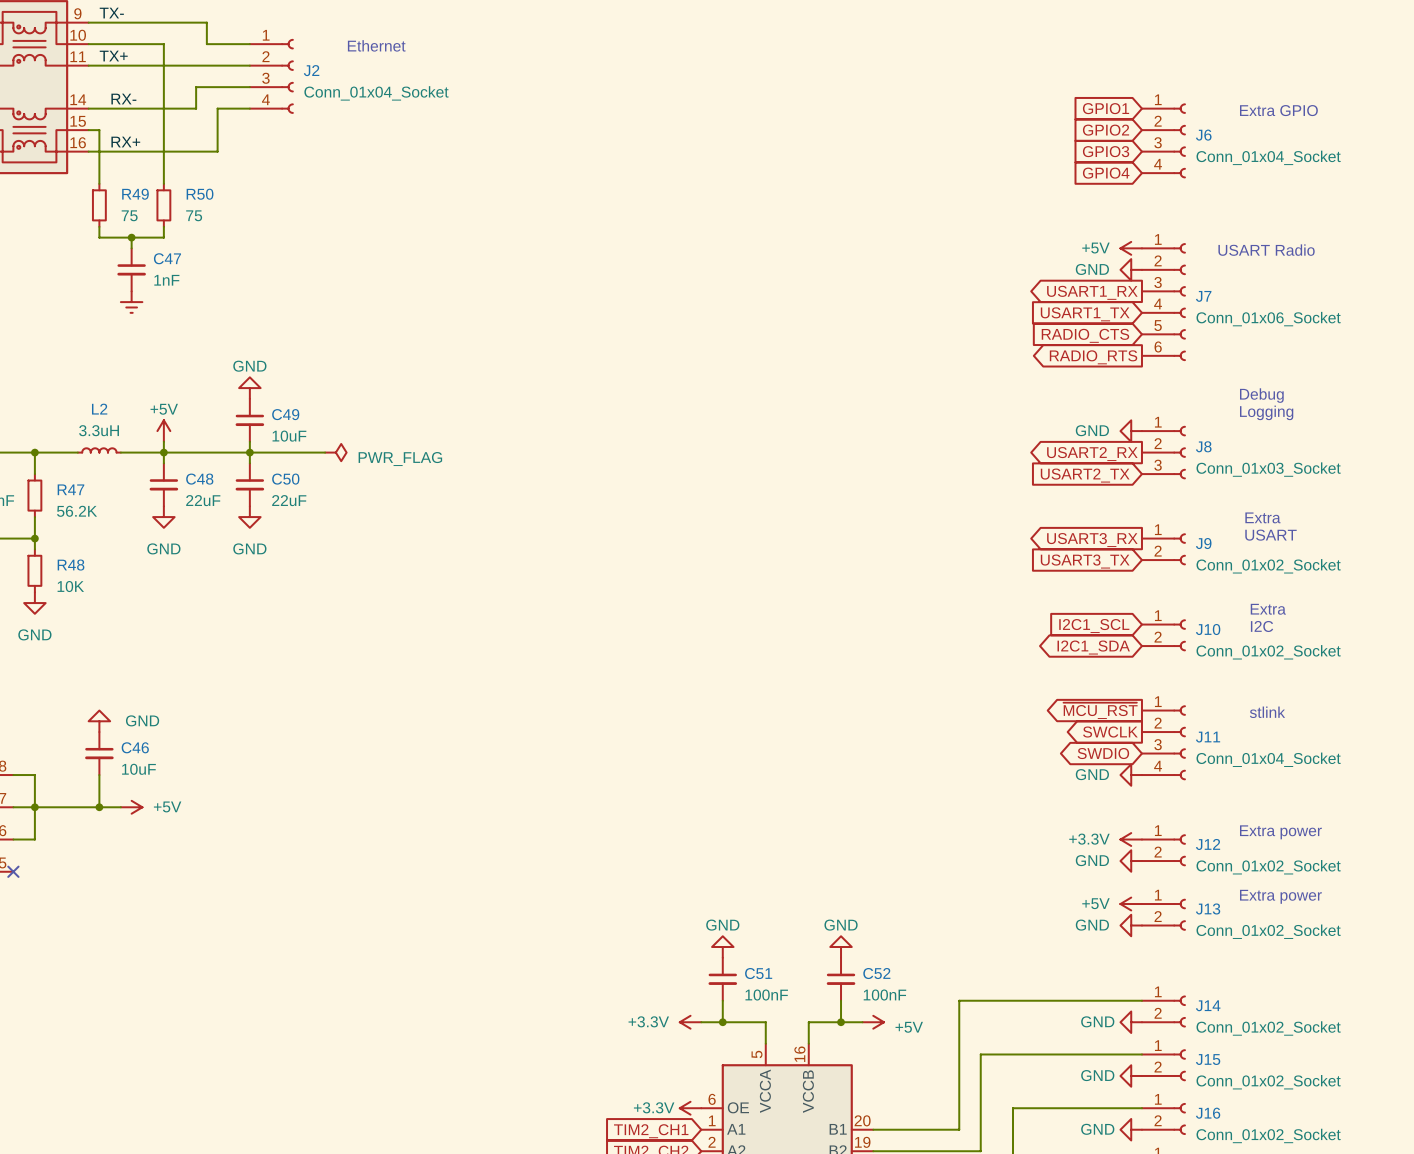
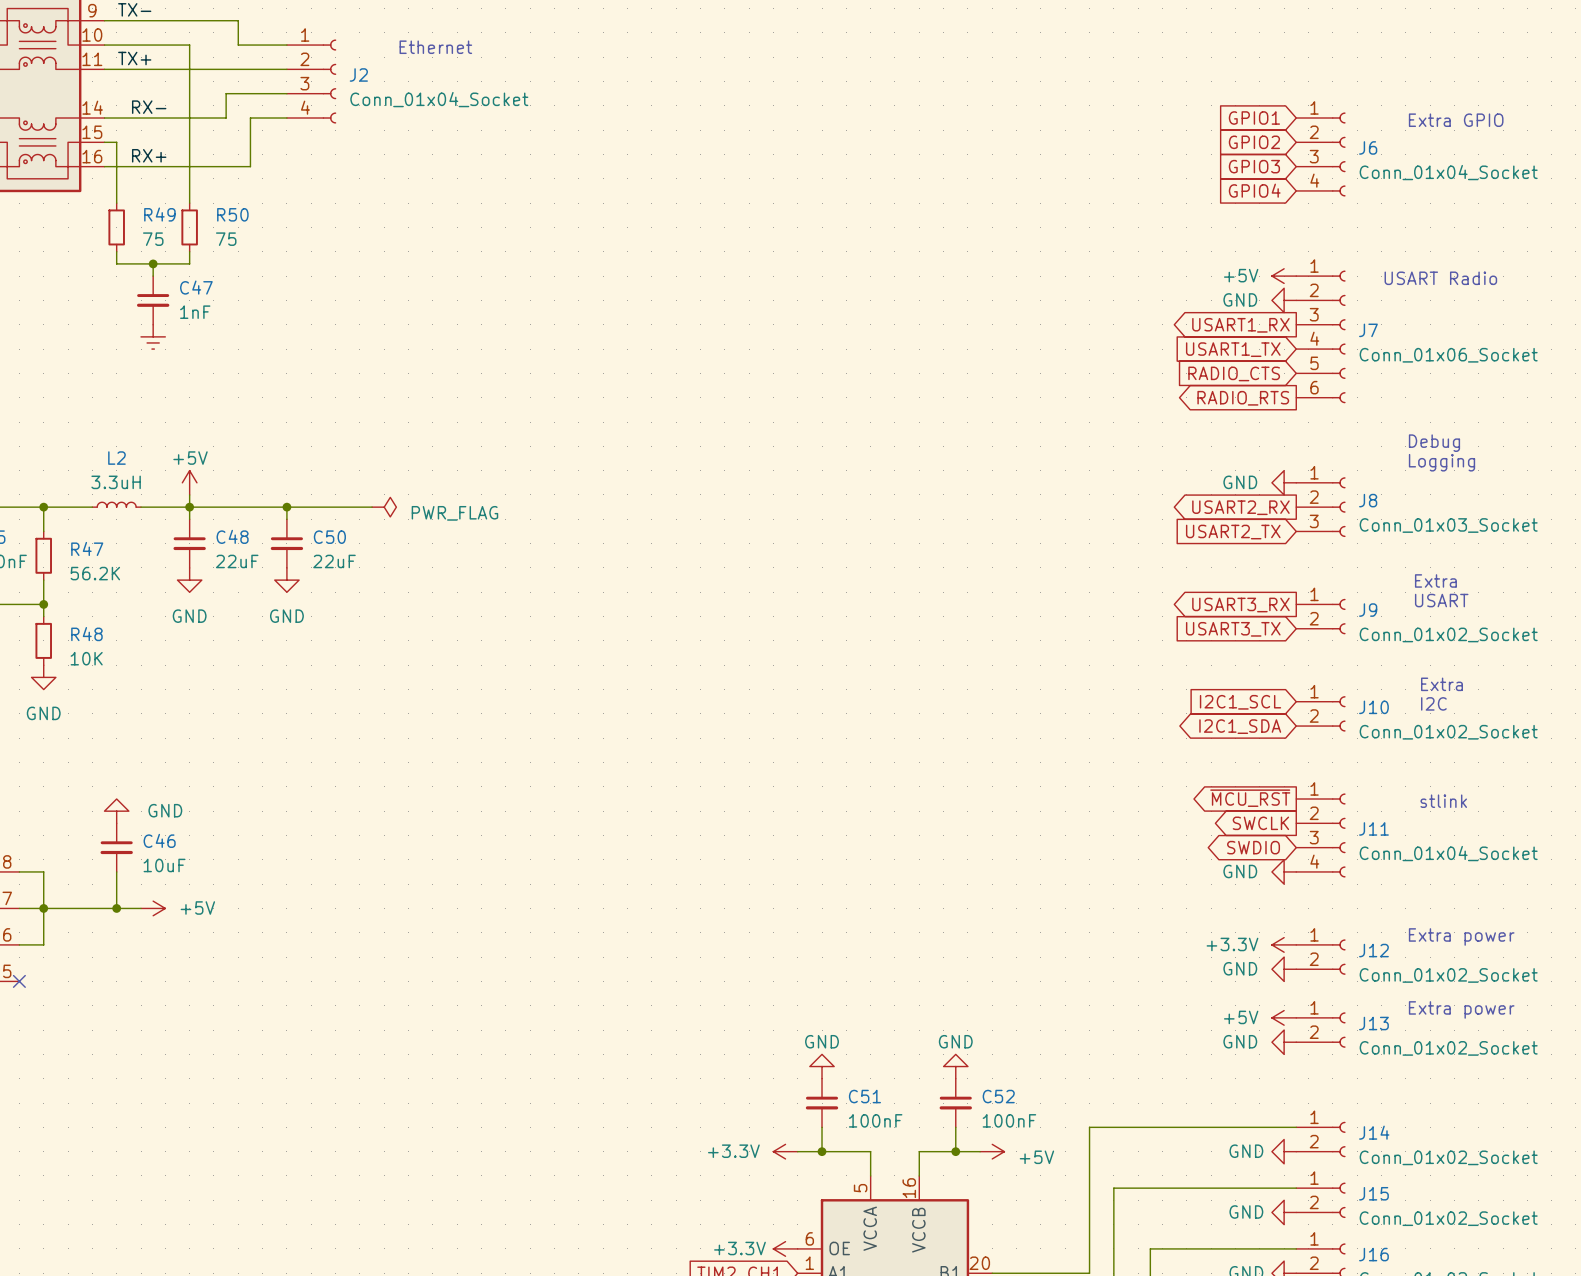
power symbol: GND (249, 388) -> none
C49: 10uF (249, 420) -> none
wire: (249, 441) (249, 452) -> none

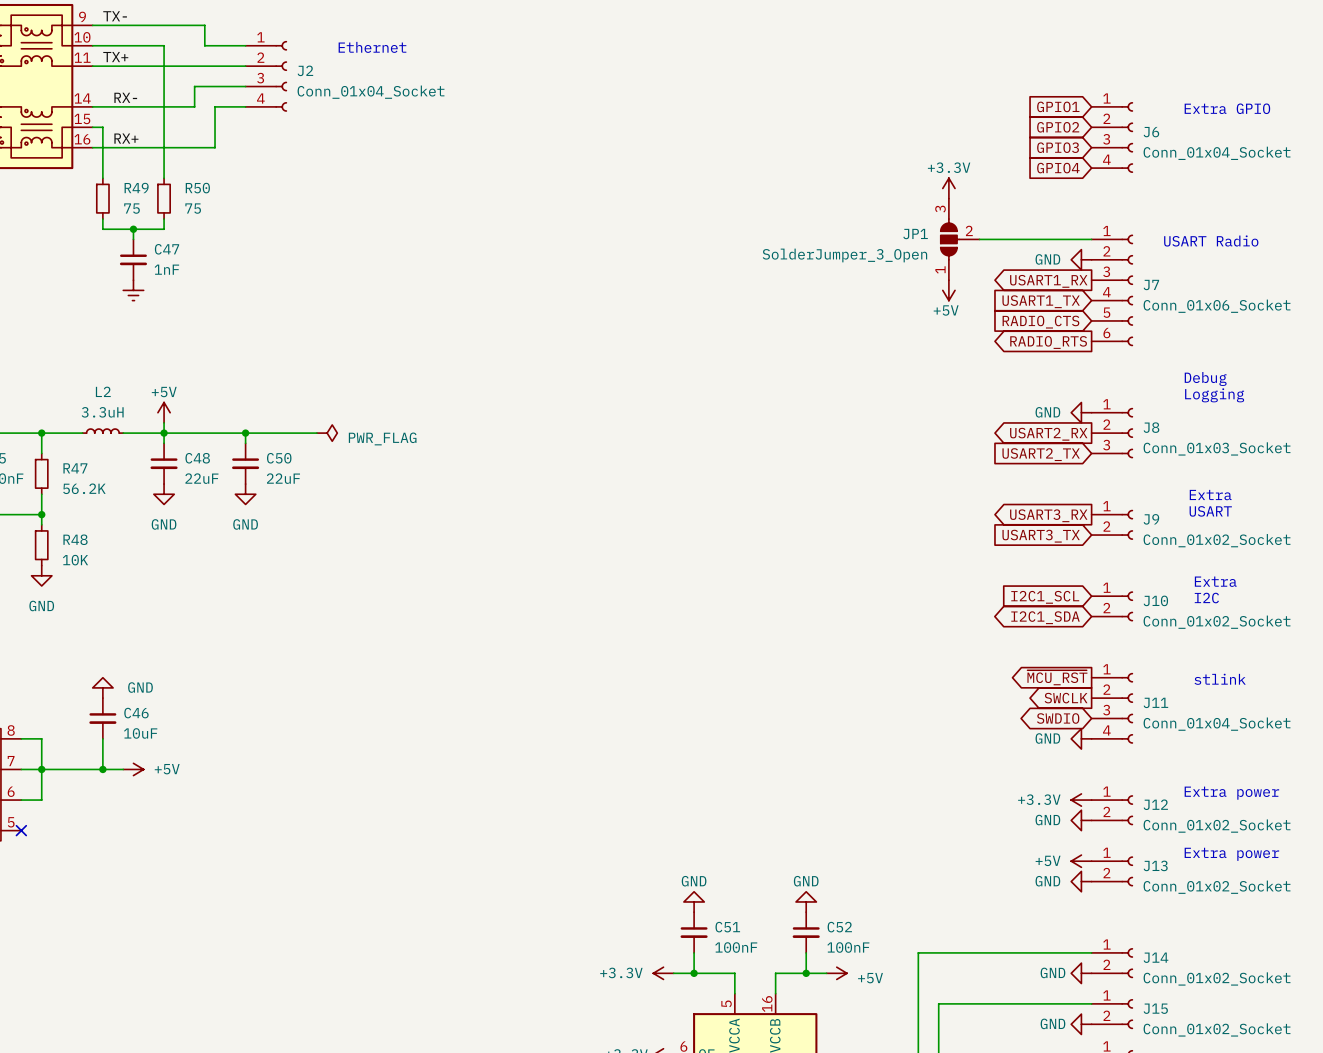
power symbol: none -> +3.3V (948, 188)
power symbol text position: +5V (1241, 275) -> +5V (946, 310)
JP1: none -> SolderJumper_3_Open (960, 239)
wire: none -> (979, 239) (1091, 239)
power symbol rotation: 0° (1284, 276) -> 90° counterclockwise (948, 290)
power symbol position: +5V (1284, 276) -> +5V (948, 290)

